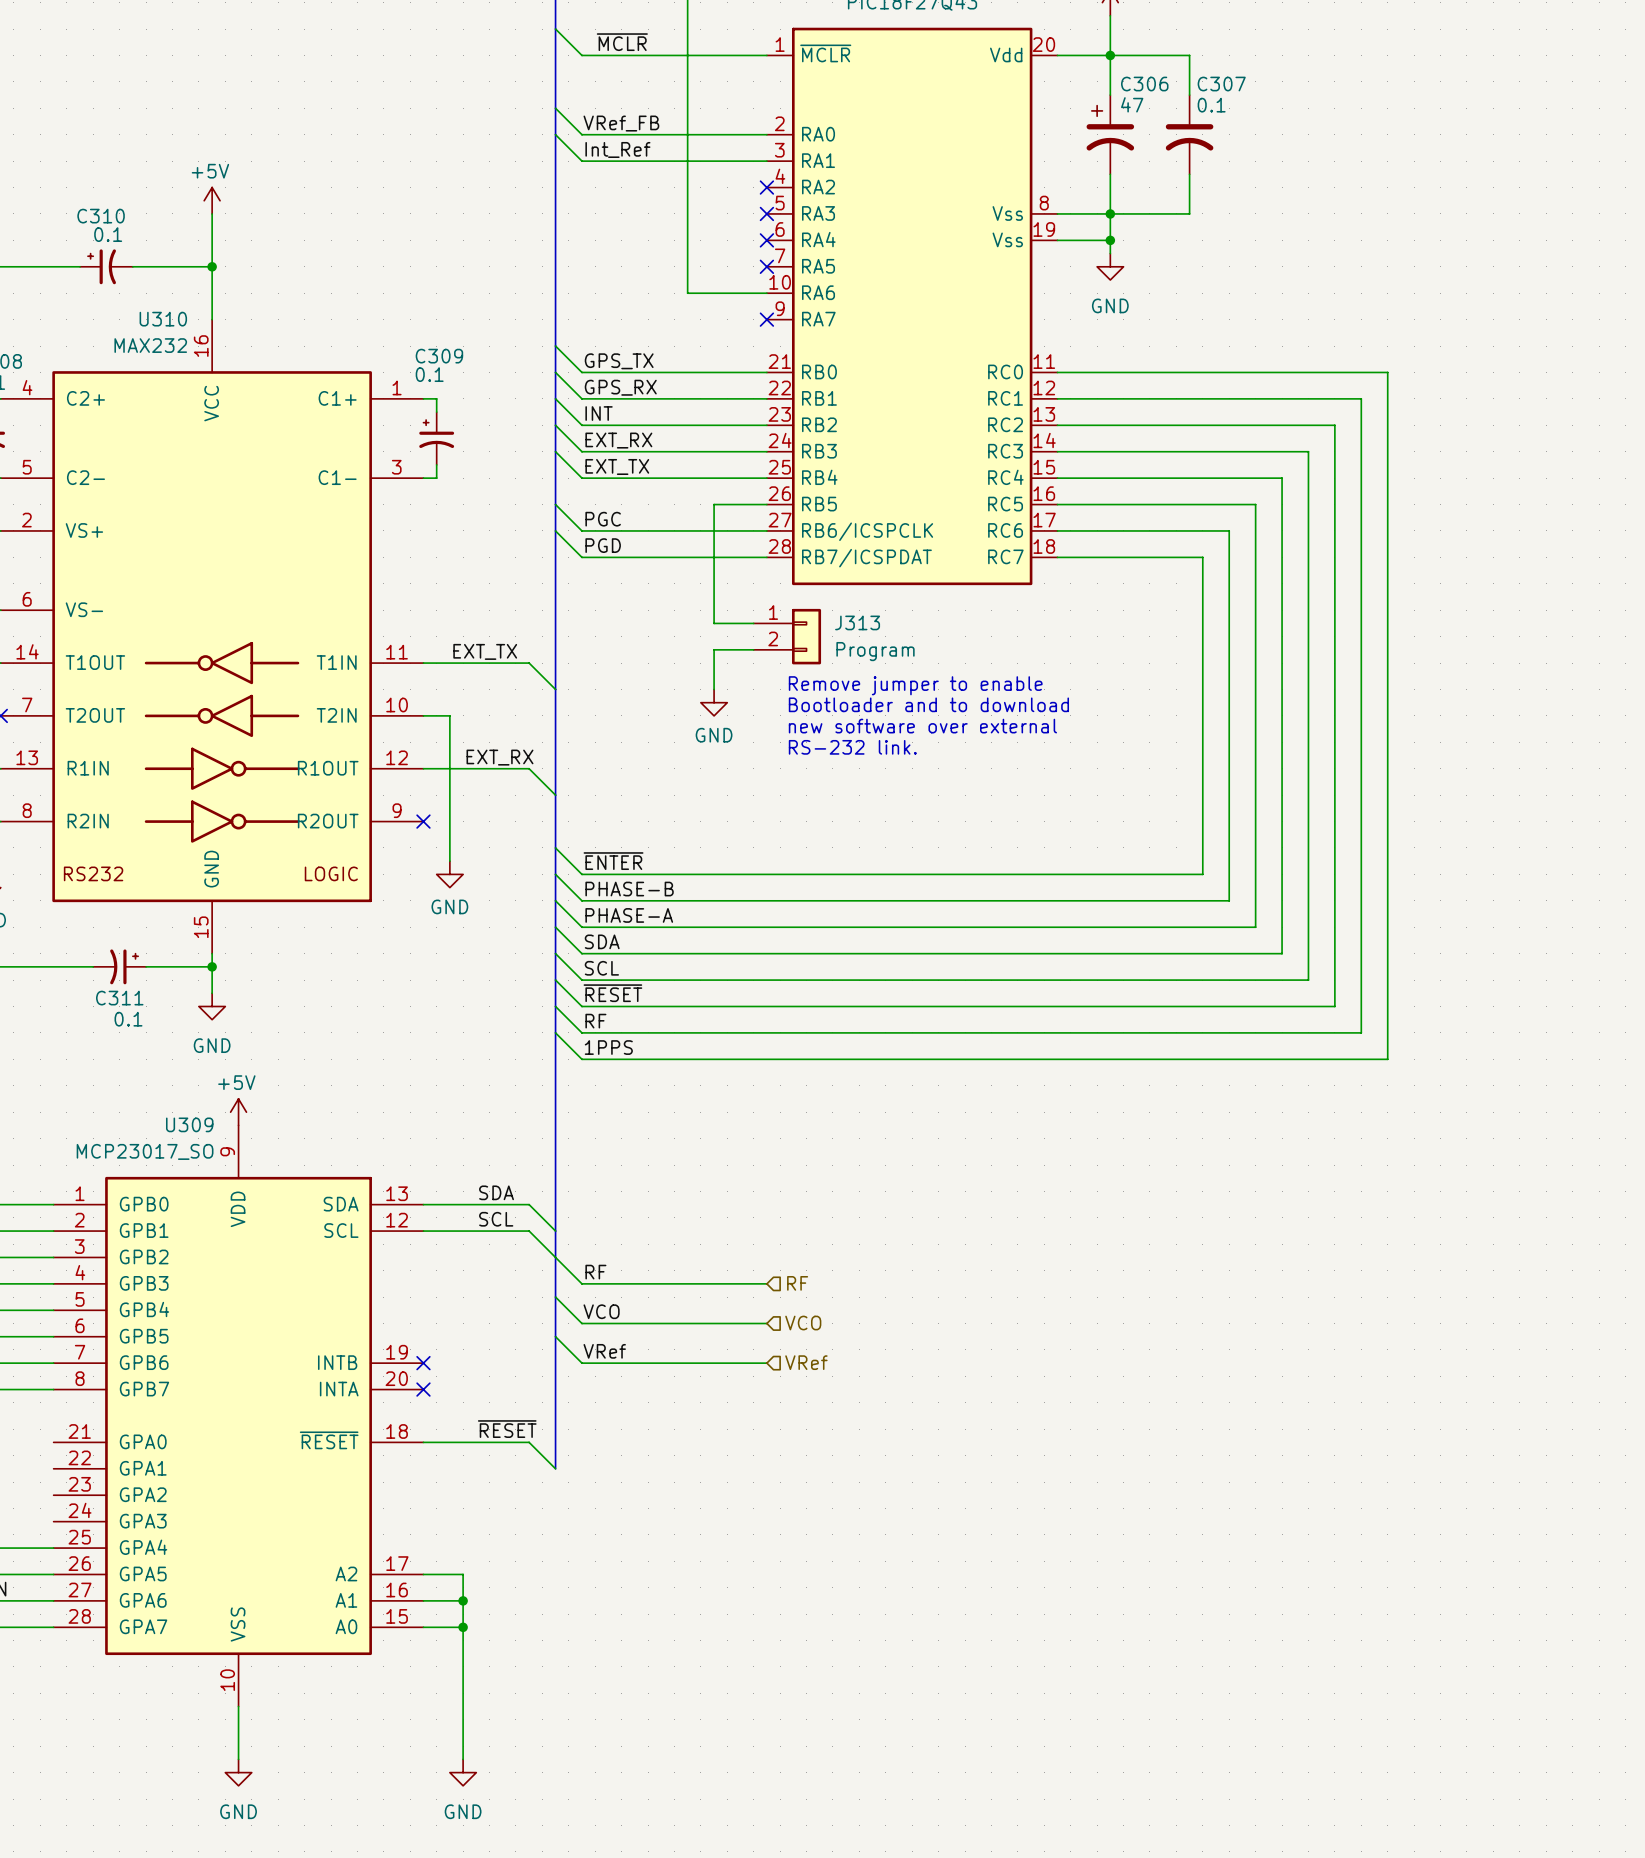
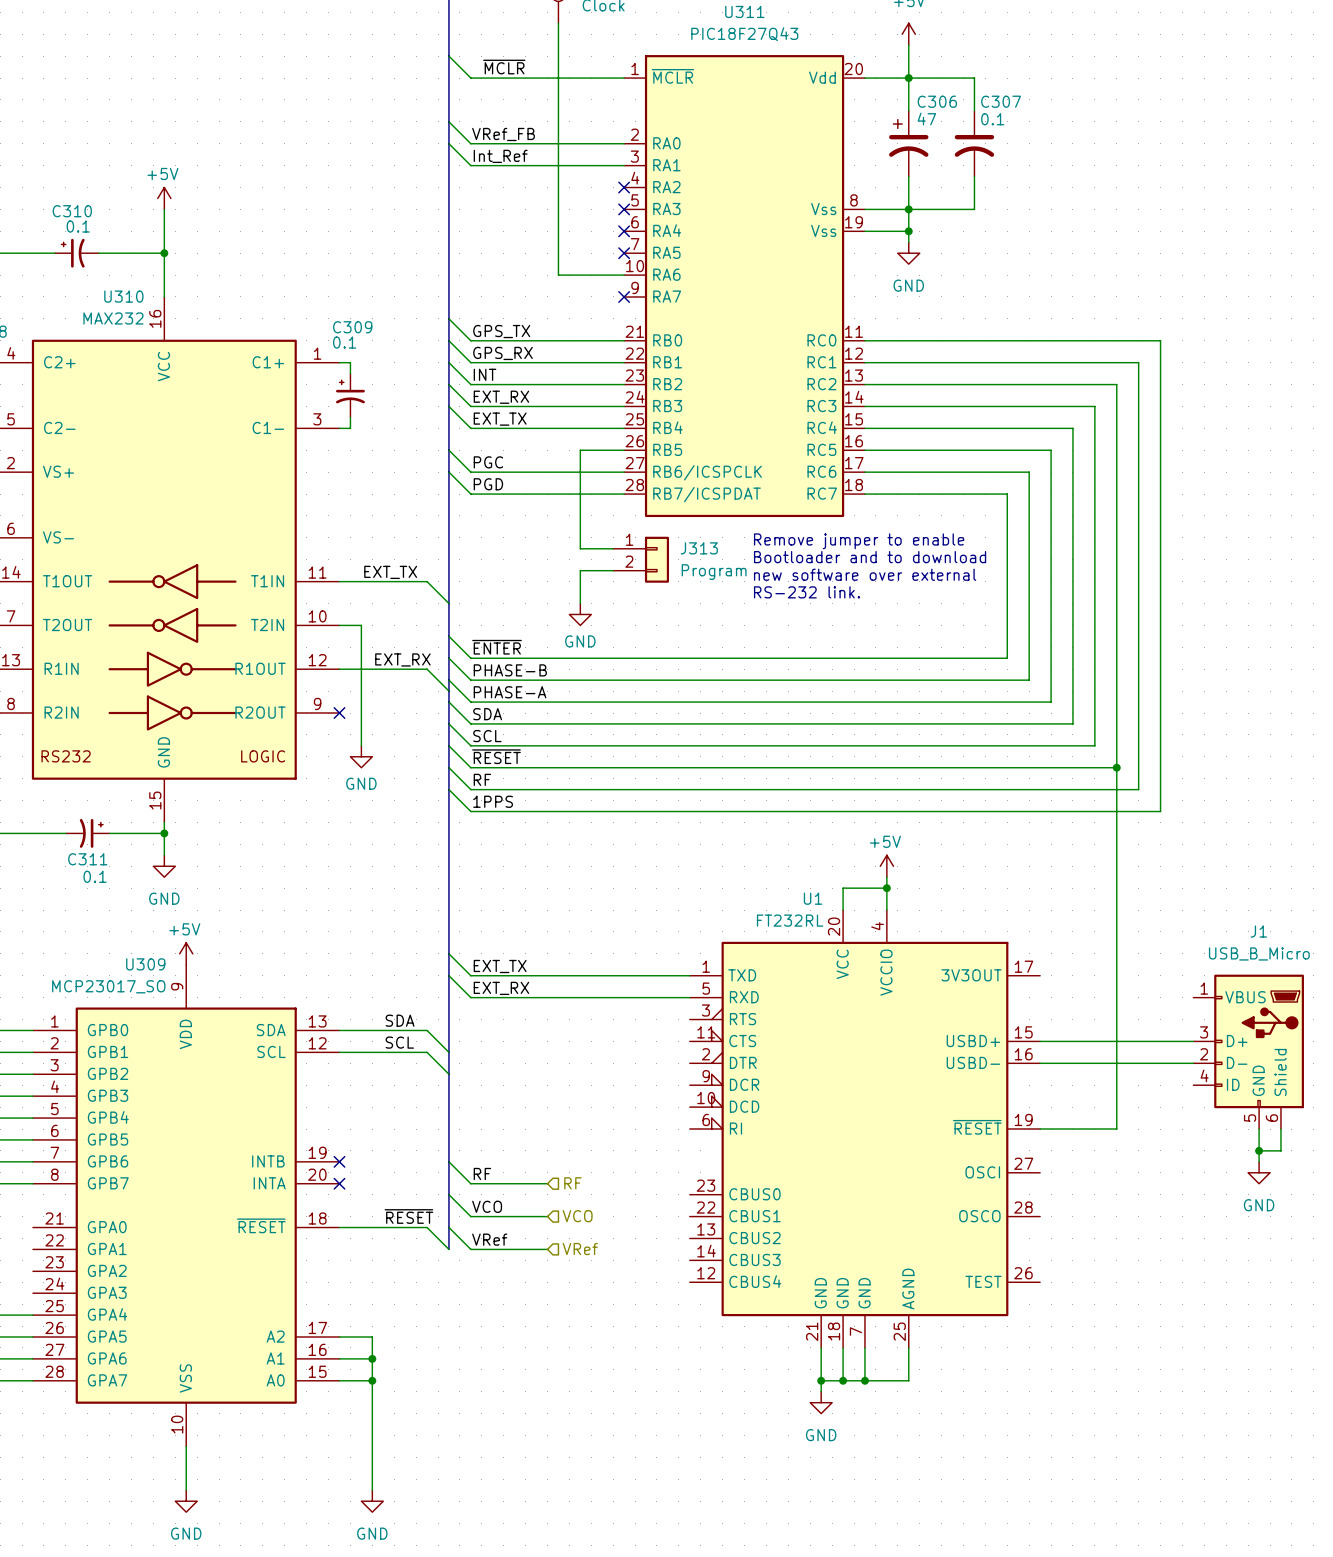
wire: (1387, 372) (1387, 398) -> (1116, 362) (1138, 362)
wire: none -> (1138, 340) (1160, 340) (1160, 811) (470, 811) (448, 789)
wire: (1361, 398) (1361, 425) -> none
wire: (1334, 425) (1334, 451) -> (1094, 384) (1116, 384)
wire: (1308, 451) (1308, 478) -> (1072, 406) (1094, 406)
wire: (1282, 478) (1282, 504) -> (1051, 428) (1072, 428)
wire: (1255, 504) (1255, 530) -> (1029, 450) (1051, 450)
wire: (1229, 530) (1229, 557) -> (985, 494) (1007, 494)
wire: none -> (1007, 472) (1029, 472)
wire: (1202, 557) (1202, 874) (581, 874) (555, 847) -> none
text position: Remove jumper to enable (915, 685) -> Remove jumper to enable (859, 541)
text position: Bootloader and to download (928, 704) -> Bootloader and to download (870, 557)
text position: new software over external (922, 726) -> new software over external (865, 574)
text position: RS-232 link. (852, 747) -> RS-232 link. (806, 592)
wire: (1229, 755) (1229, 900) (581, 900) (555, 874) -> (1007, 658) (470, 658) (448, 636)
wire: (1255, 781) (1255, 927) (581, 927) (555, 900) -> (1029, 680) (470, 680) (448, 658)
wire: (1282, 808) (1282, 953) (581, 953) (555, 927) -> (1051, 702) (470, 702) (448, 680)
wire: (1308, 834) (1308, 980) (581, 980) (555, 953) -> (1072, 723) (470, 723) (448, 702)
wire: none -> (448, 745) (470, 767) (1116, 767)
label position: ~{ENTER} (613, 861) -> ~{ENTER} (497, 647)
wire: (1334, 861) (1334, 1006) (581, 1006) (555, 980) -> (1094, 745) (470, 745) (448, 723)
junction: none -> (1116, 767)
label position: PHASE-B (629, 889) -> PHASE-B (510, 670)
wire: (1387, 914) (1387, 1059) (581, 1059) (555, 1032) -> (1138, 789) (470, 789) (448, 767)
label position: PHASE-A (629, 915) -> PHASE-A (510, 692)
label position: SDA (602, 941) -> SDA (487, 714)
label position: SCL (601, 968) -> SCL (487, 736)
label position: ~{RESET} (612, 993) -> ~{RESET} (496, 756)
wire: (555, 1006) (581, 1032) (1031, 1032) -> (843, 910) (843, 888)
power symbol: none -> +5V (886, 866)
wire: none -> (886, 877) (886, 910)
label position: RF (595, 1021) -> RF (482, 779)
wire: (1083, 1032) (1361, 1032) -> (1040, 1129) (1116, 1129) (1116, 888)
junction: none -> (886, 888)
label position: 1PPS (608, 1047) -> 1PPS (493, 801)
wire: none -> (448, 953) (470, 975) (689, 975)
label: none -> EXT_TX (500, 966)
wire: none -> (448, 975) (470, 997) (689, 997)
label: none -> EXT_RX (501, 988)
wire: none -> (1040, 1041) (1193, 1041)
J1: none -> USB_B_Micro (1248, 1051)
wire: none -> (1040, 1063) (1193, 1063)
wire: (555, 1257) (581, 1283) (766, 1283) -> none
label position: RF (595, 1272) -> RF (482, 1173)
hierarchical label position: RF (797, 1283) -> RF (572, 1183)
wire: (555, 1297) (581, 1323) (766, 1323) -> none
label position: VCO (601, 1311) -> VCO (487, 1206)
hierarchical label position: VCO (803, 1323) -> VCO (577, 1216)
U1: none -> FT232RL (864, 1129)
wire: none -> (1259, 1129) (1259, 1161)
wire: none -> (1280, 1129) (1280, 1150) (1259, 1150)
wire: (555, 1336) (581, 1363) (766, 1363) -> none
junction: none -> (1259, 1150)
label position: VRef (604, 1351) -> VRef (489, 1239)
hierarchical label position: VRef (806, 1362) -> VRef (580, 1249)
wire: none -> (448, 1161) (470, 1183) (547, 1183)
power symbol: none -> GND (1259, 1172)
wire: none -> (448, 1194) (470, 1216) (547, 1216)
wire: none -> (448, 1227) (470, 1249) (547, 1249)
wire: none -> (821, 1347) (821, 1391)
wire: none -> (843, 1347) (843, 1380)
wire: none -> (864, 1347) (864, 1380)
wire: none -> (908, 1347) (908, 1380) (821, 1380)
junction: none -> (821, 1380)
junction: none -> (843, 1380)
junction: none -> (864, 1380)
power symbol: none -> GND (821, 1402)

